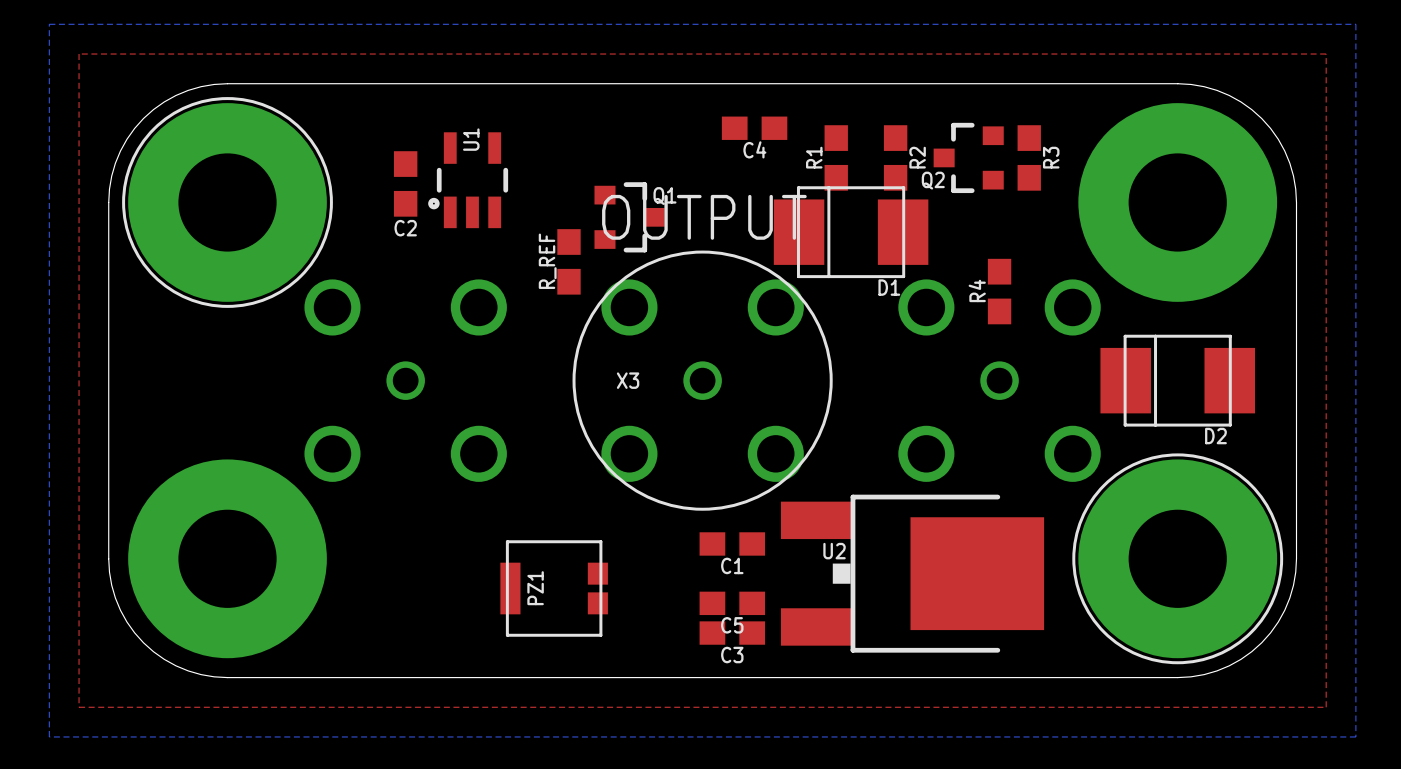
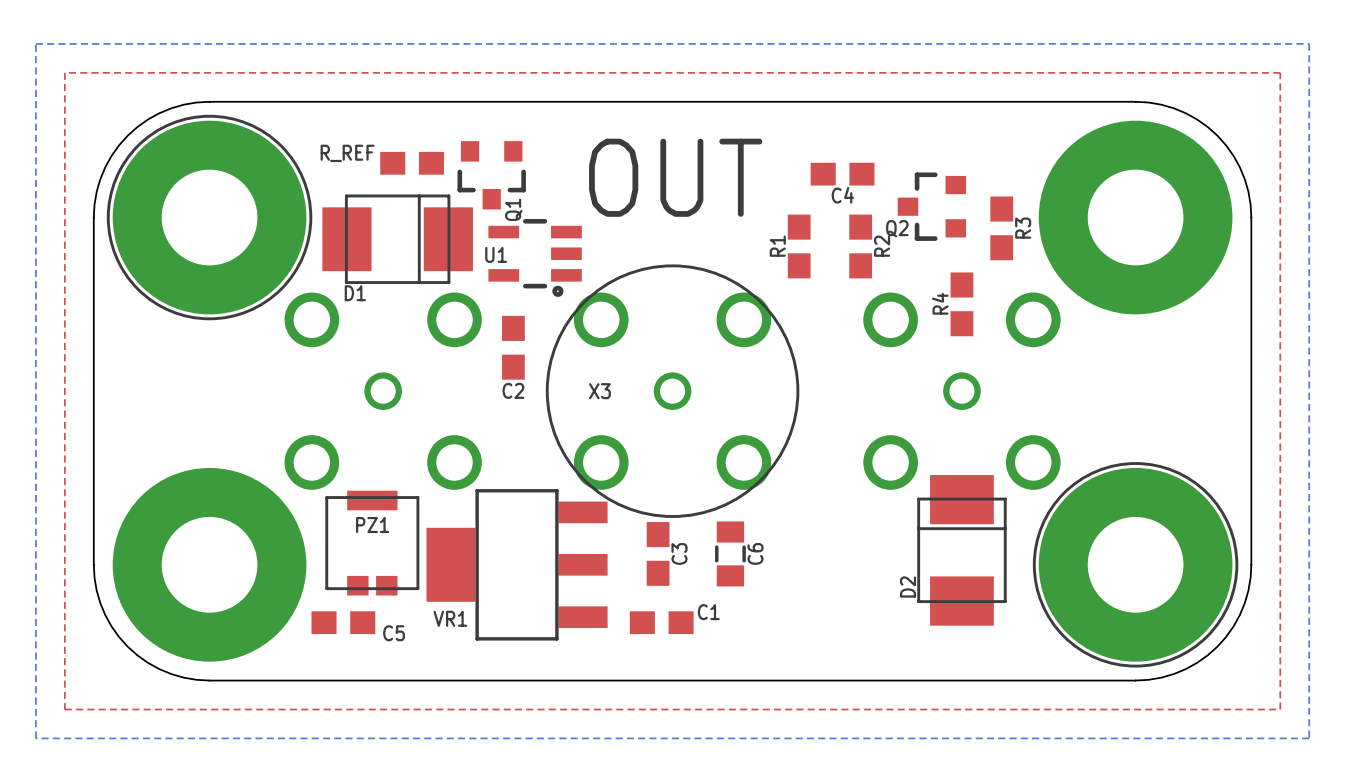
C4 position: (754, 128) -> (842, 174)
R1 position: (836, 157) -> (799, 246)
R2 position: (895, 157) -> (860, 246)
Q2 position: (968, 157) -> (931, 206)
R3 position: (1029, 157) -> (1001, 228)
U1 rotation: 0° (468, 180) -> 90° counterclockwise (535, 257)
U1 position: (468, 180) -> (535, 257)
C2 position: (405, 183) -> (513, 347)
Q1 rotation: 0° (629, 217) -> 90° clockwise (491, 175)
Q1 position: (629, 217) -> (491, 175)
text: OUTPUT (704, 217) -> OUT (675, 177)
D1 rotation: 0° (851, 232) -> 180° (397, 239)
D1 position: (851, 232) -> (397, 239)
R_REF rotation: 0° (568, 261) -> 90° clockwise (412, 163)
R_REF position: (568, 261) -> (412, 163)
D1 name position: D1 (889, 287) -> D1 (355, 293)
D2 rotation: 0° (1177, 380) -> 90° clockwise (961, 550)
D2 position: (1177, 380) -> (961, 550)
C1 position: (732, 543) -> (661, 622)
C6: none -> (730, 553)
VR1: none -> (517, 564)
C1 name position: C1 (732, 565) -> C1 (708, 612)
U2: (912, 573) -> none
PZ1 rotation: 0° (554, 588) -> 90° clockwise (372, 543)
PZ1 position: (554, 588) -> (372, 543)
C5 position: (732, 603) -> (343, 622)
C5 name position: C5 (732, 625) -> C5 (394, 633)
C3 rotation: 0° (732, 633) -> 90° clockwise (658, 553)
C3 position: (732, 633) -> (658, 553)

